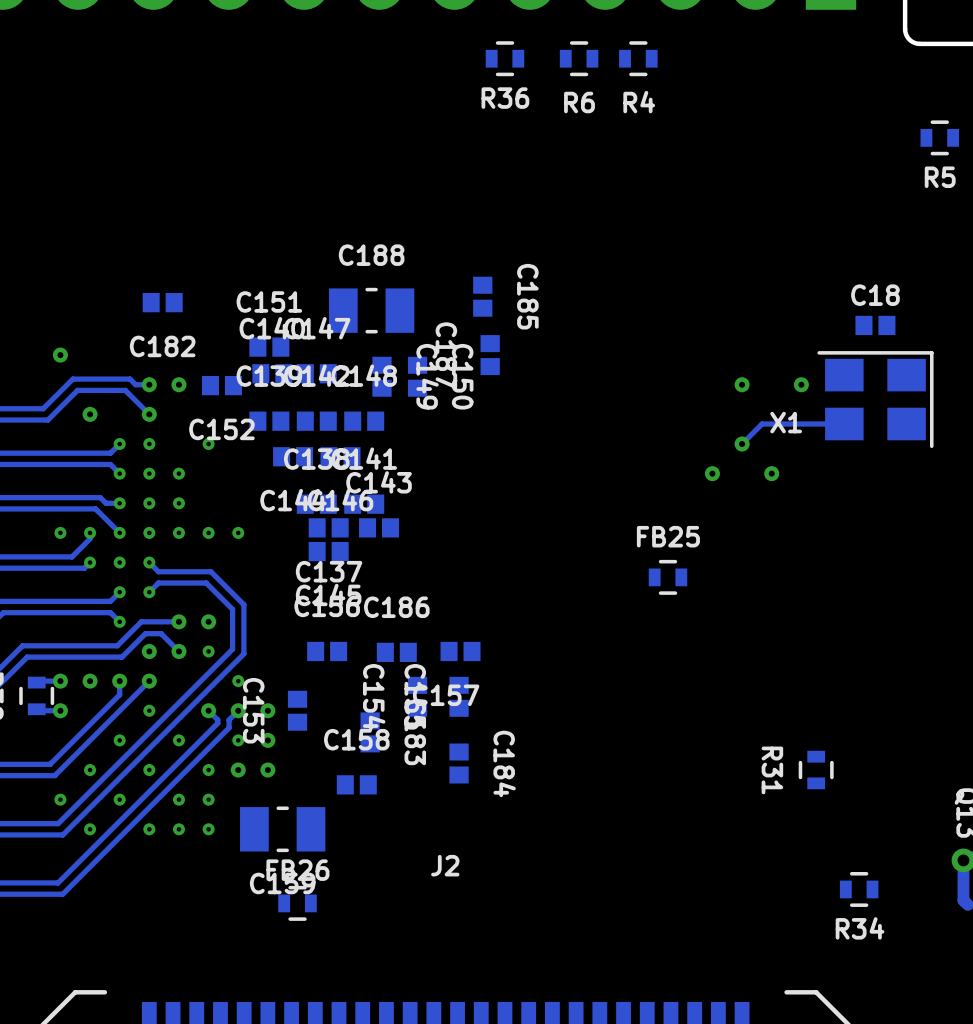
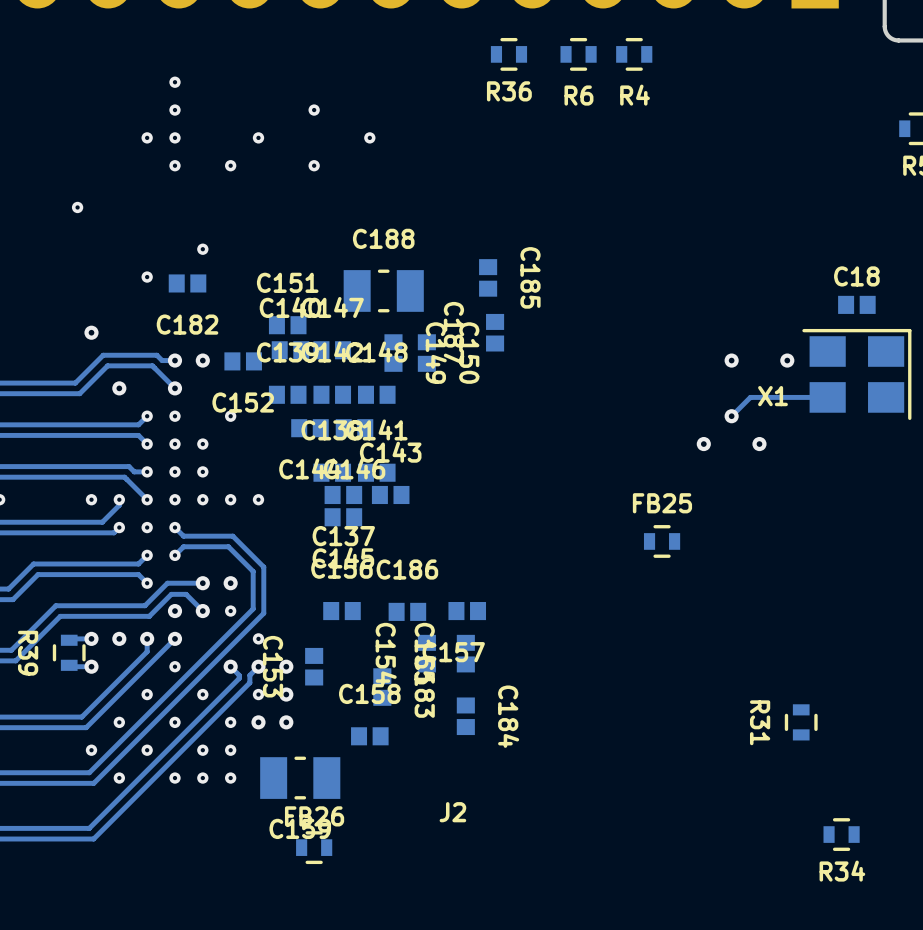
via: none -> (174, 82)
via: none -> (174, 110)
via: none -> (314, 110)
via: none -> (147, 137)
via: none -> (174, 137)
via: none -> (258, 137)
via: none -> (369, 137)
via: none -> (174, 165)
via: none -> (230, 165)
via: none -> (314, 165)
via: none -> (77, 207)
via: none -> (202, 249)
via: none -> (147, 277)

